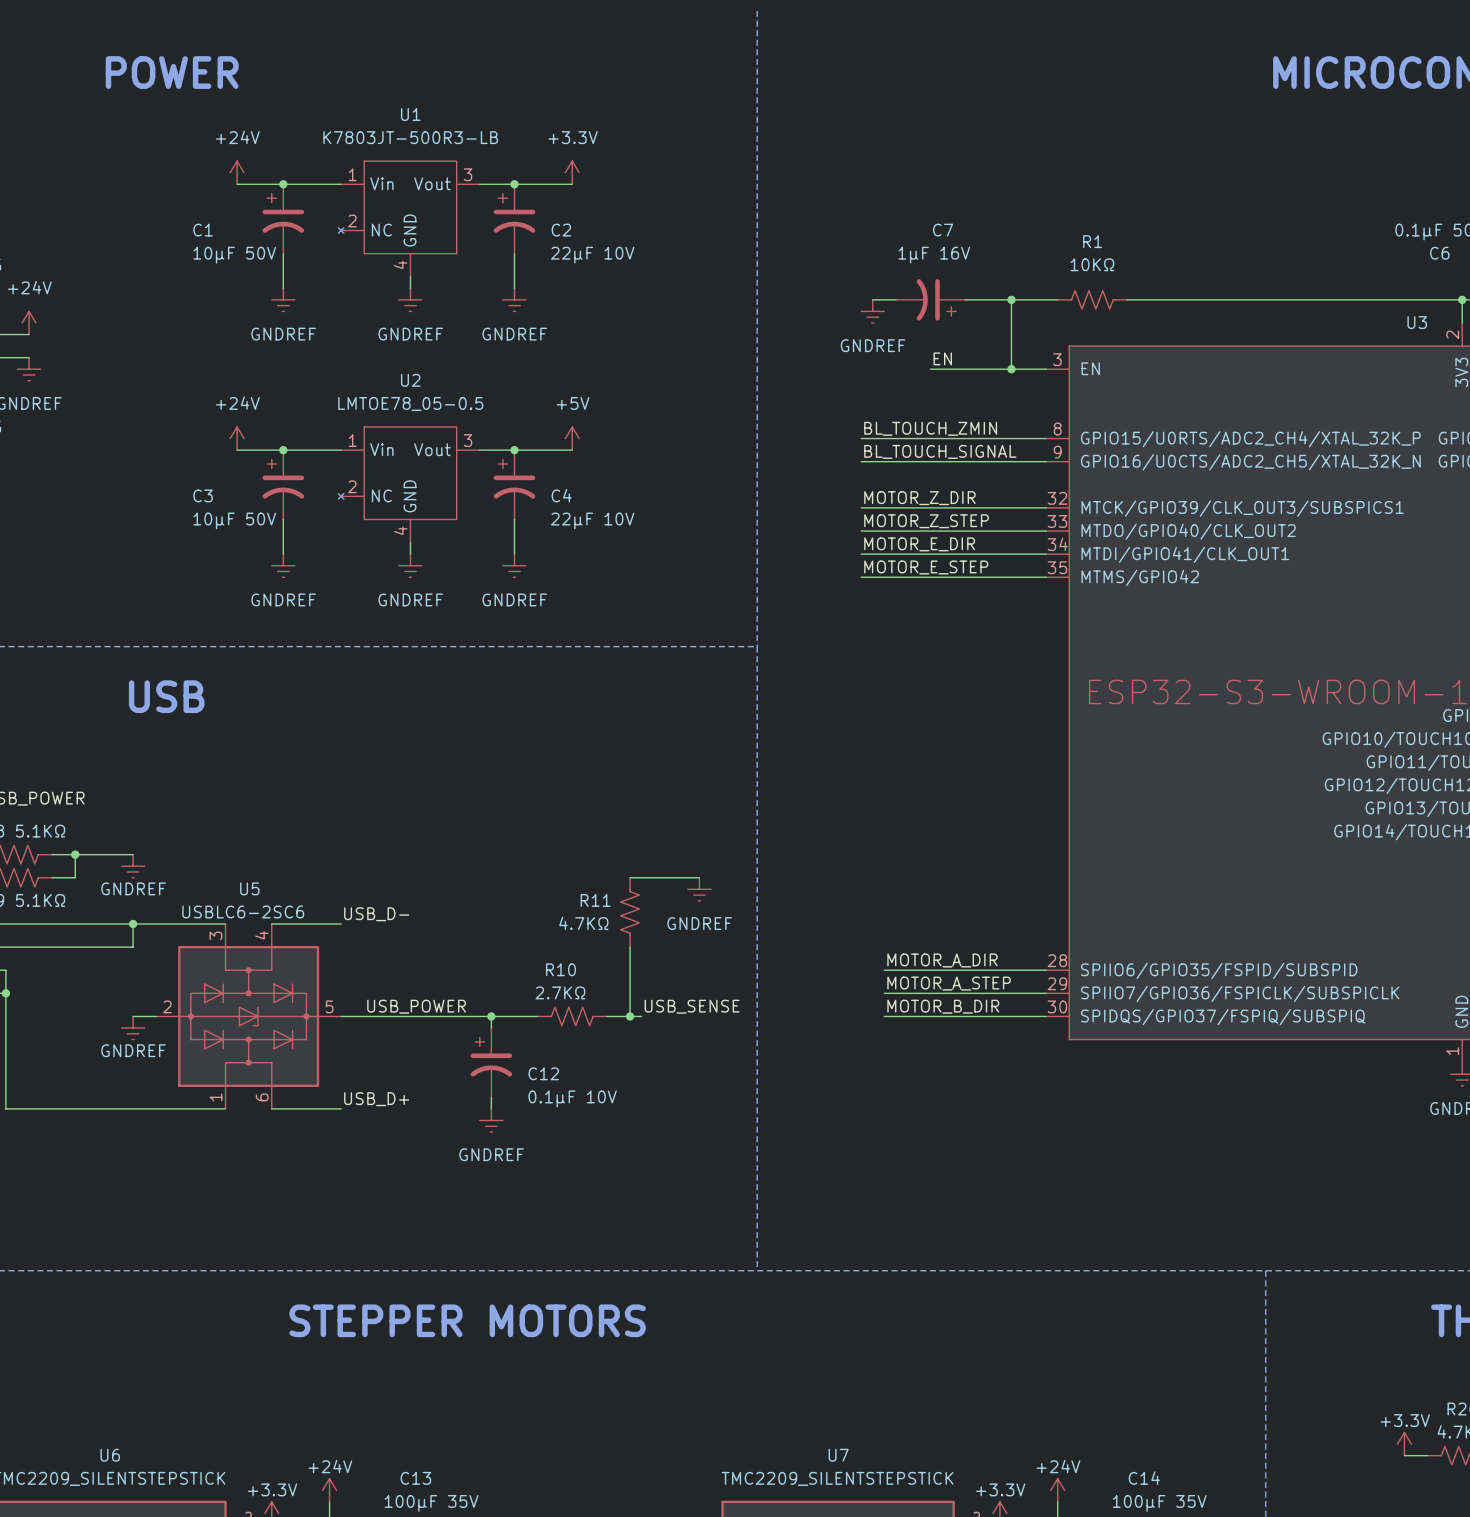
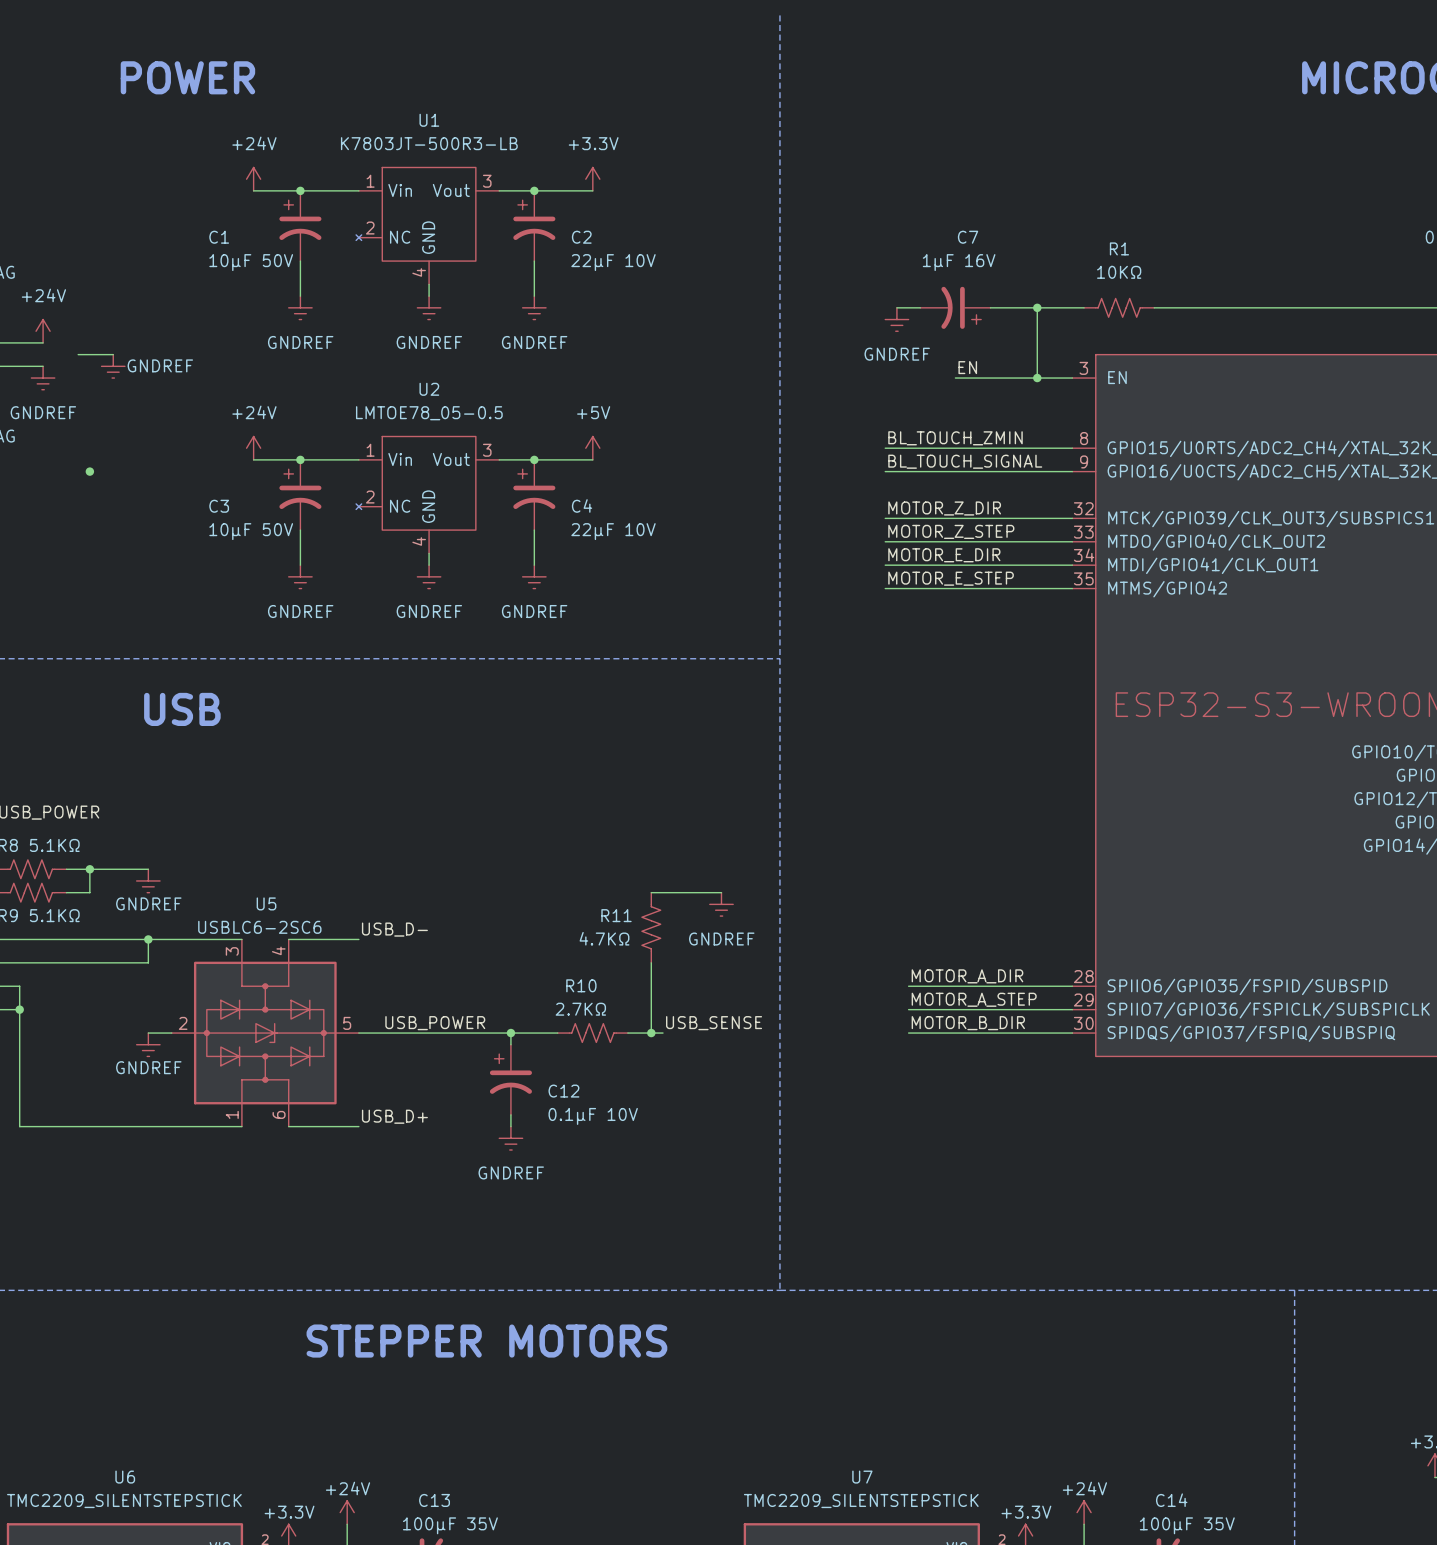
wire: none -> (78, 354) (113, 354)
power symbol: none -> GNDREF (113, 366)
junction: none -> (89, 471)

